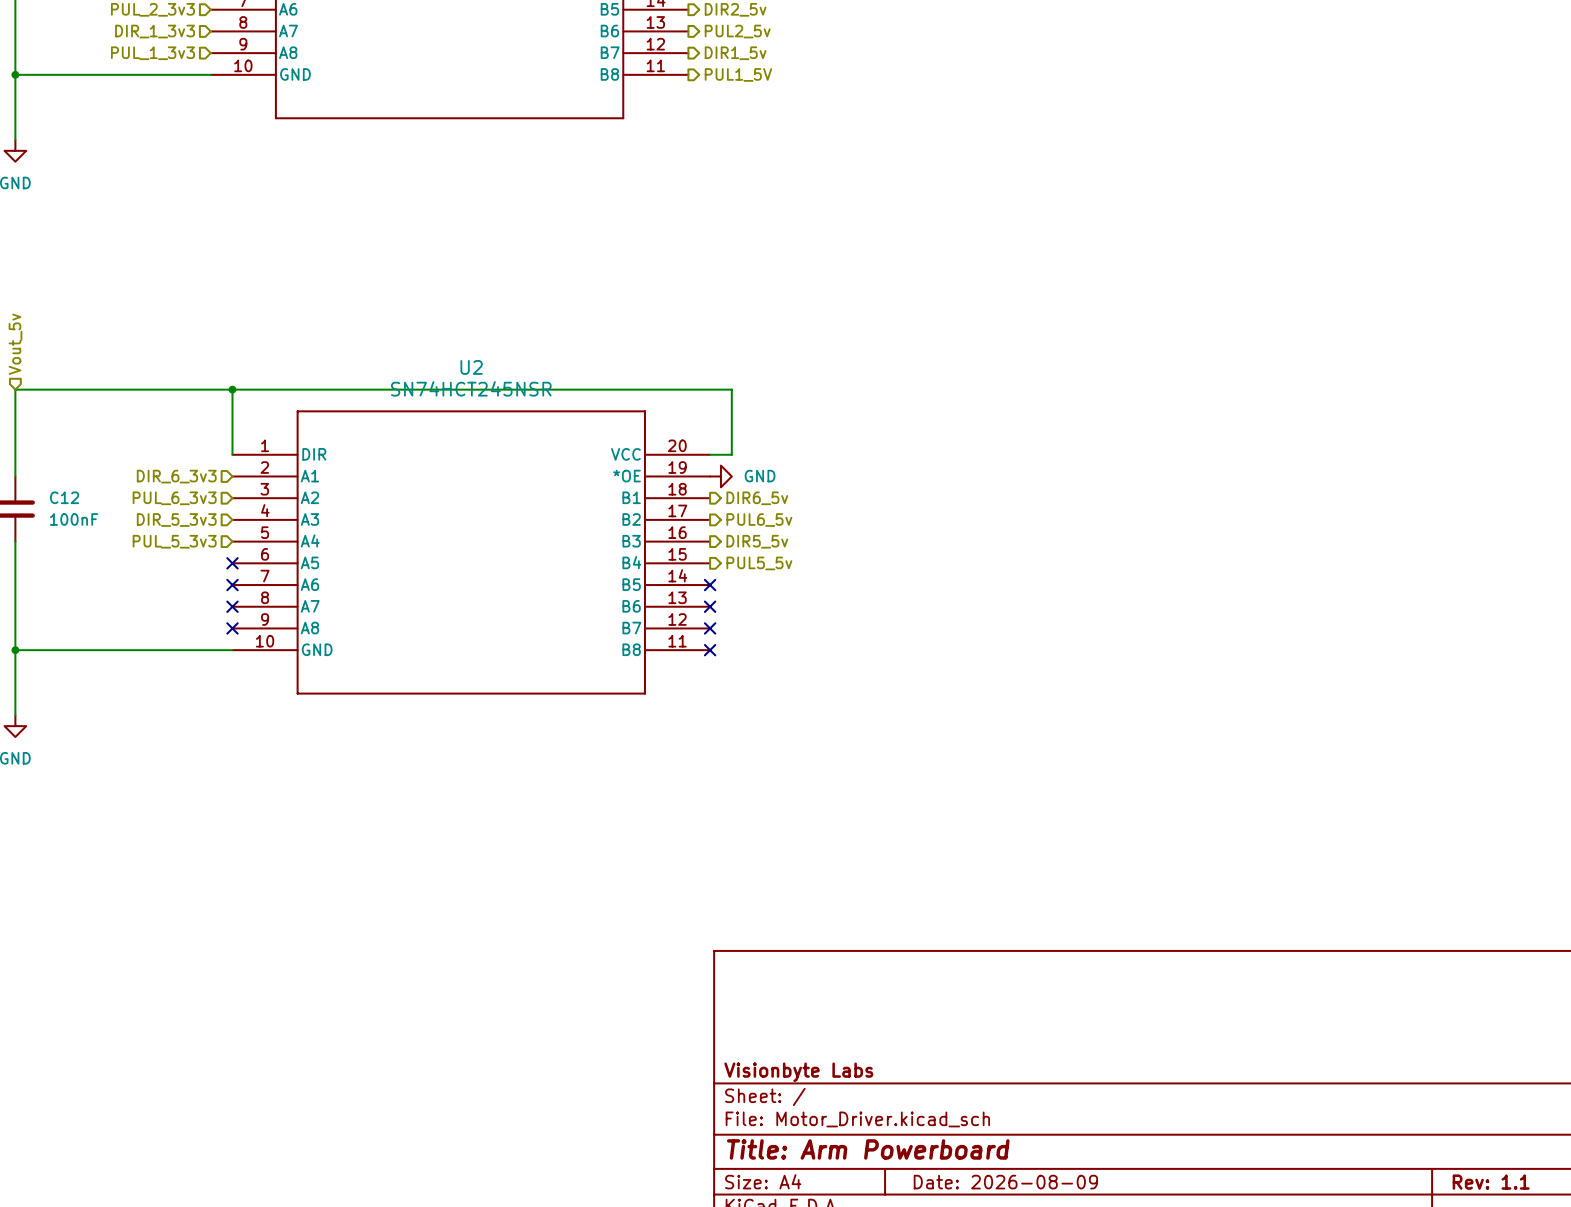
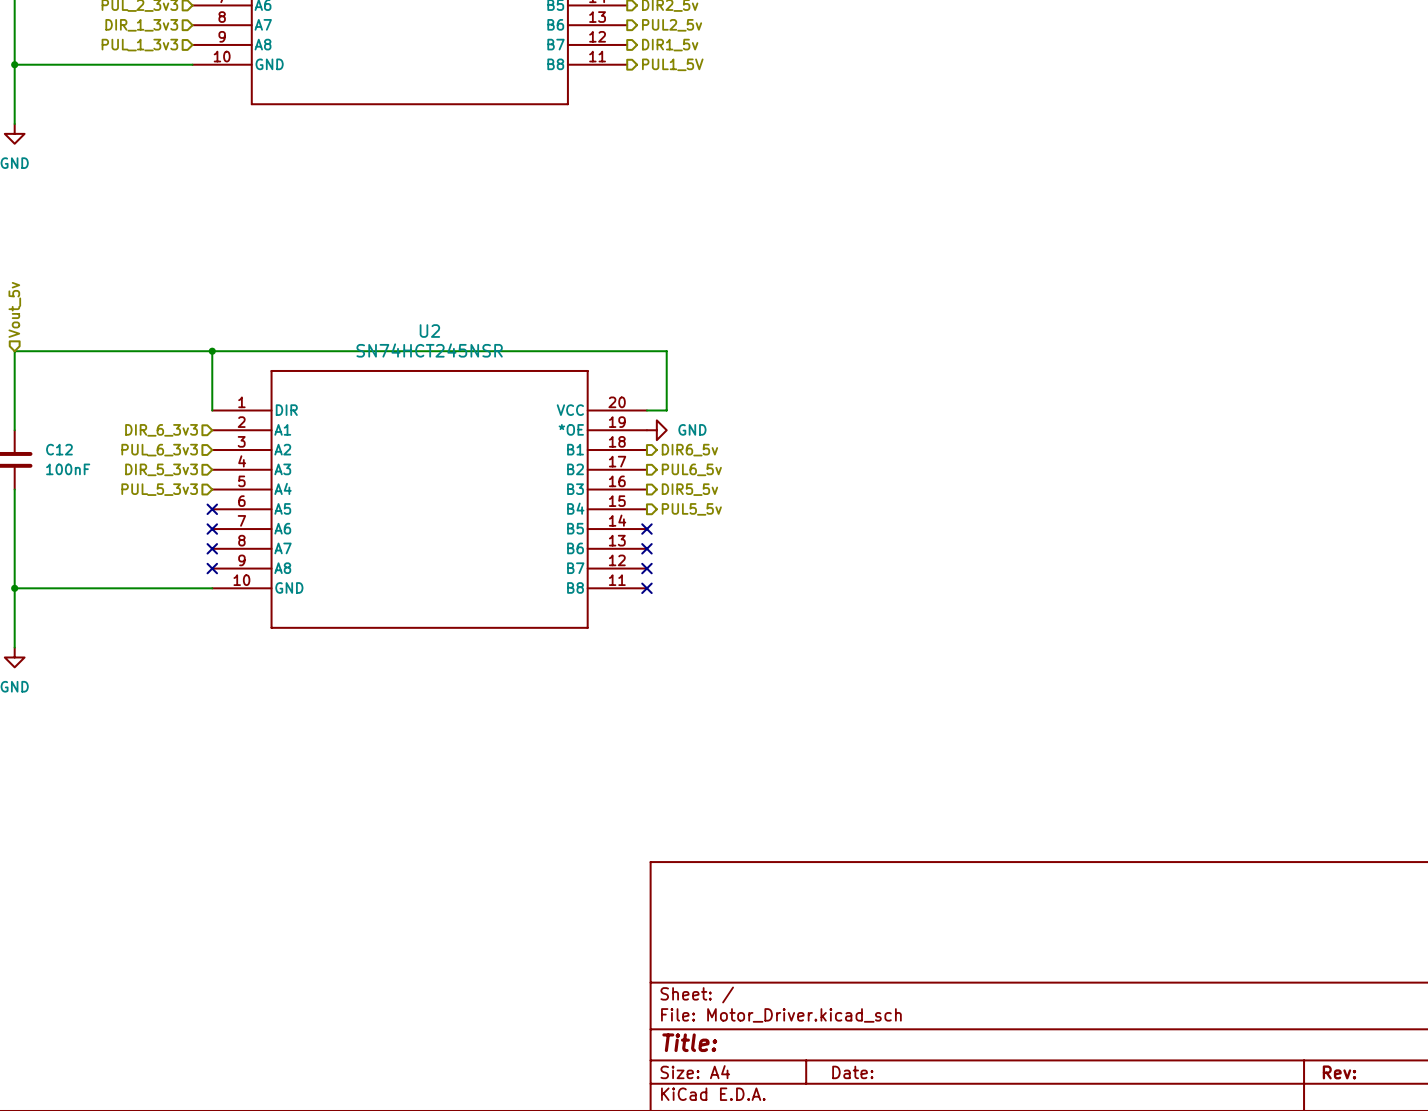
title block: Visionbyte Labs (798, 1072) -> none
title block: Title: Arm Powerboard (868, 1149) -> Title: (689, 1042)
title block: Date: 2026-08-09 (1005, 1182) -> Date: (852, 1072)
title block: Rev: 1.1 (1491, 1182) -> Rev: (1339, 1072)

